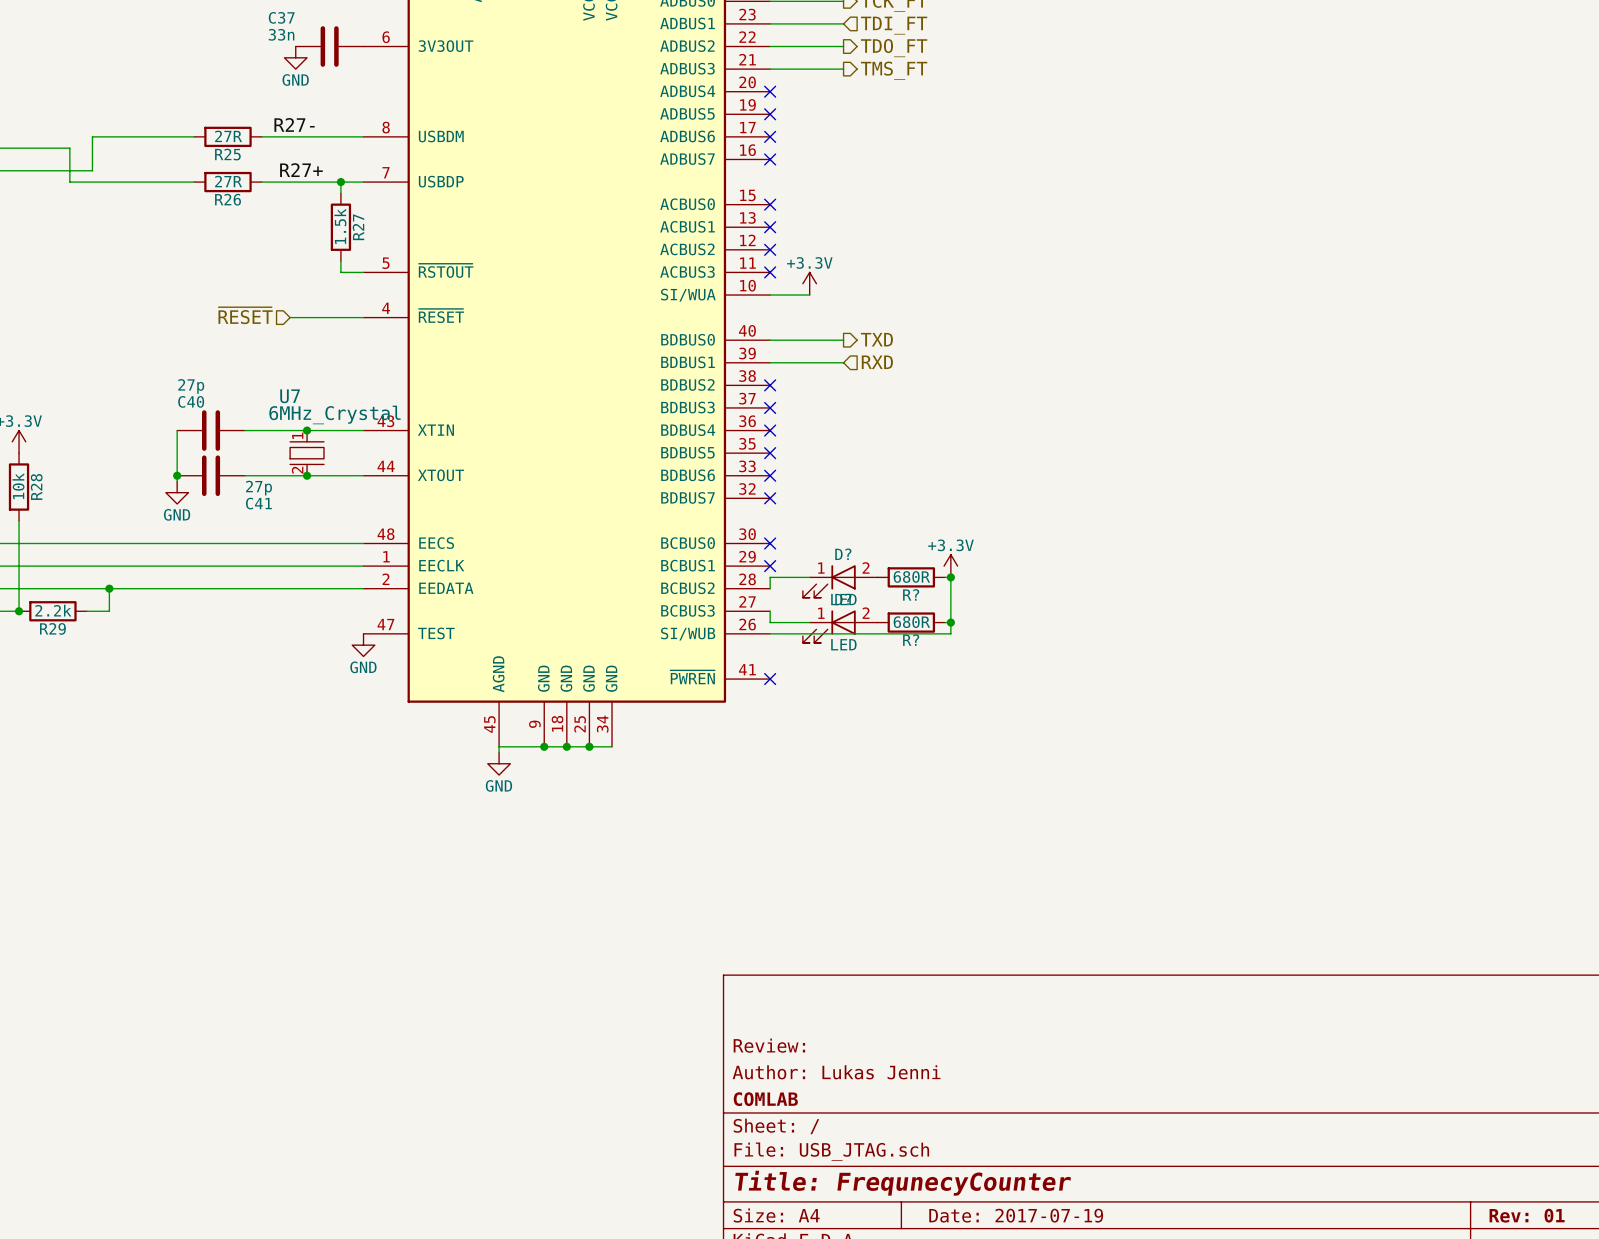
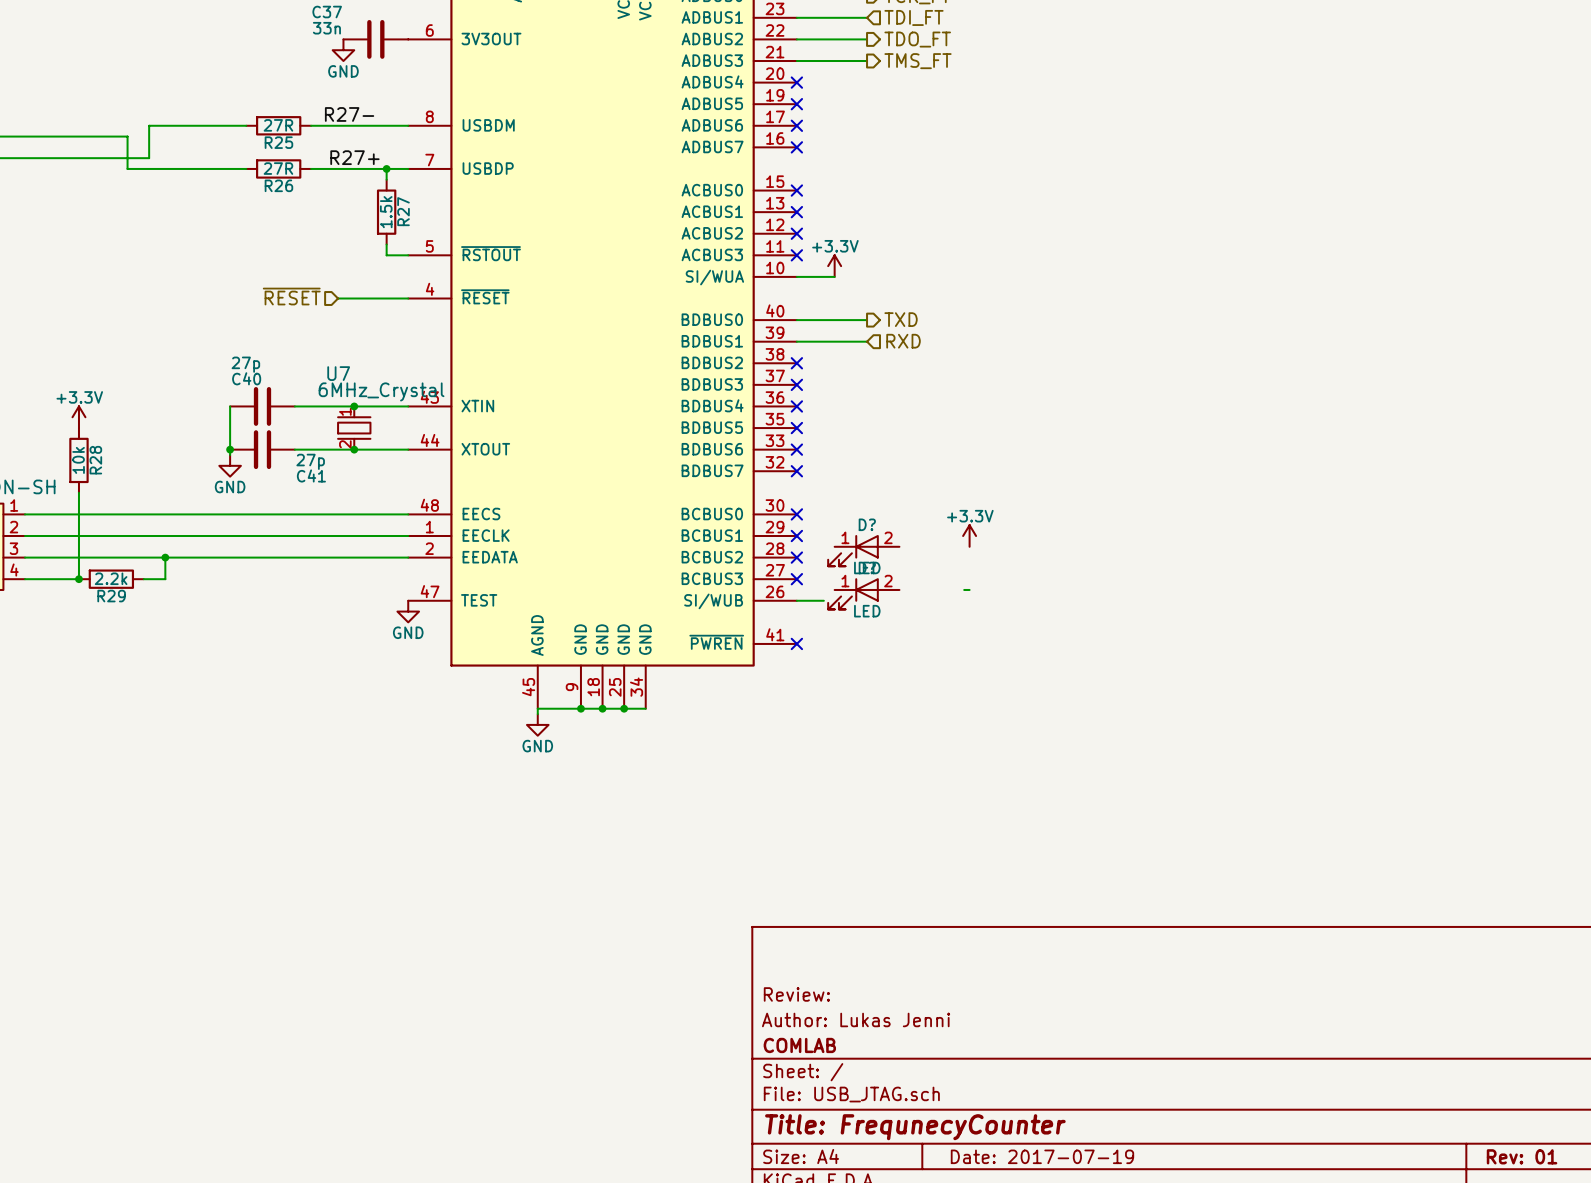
wire: (809, 577) (770, 577) (770, 588) -> none
R?: 680R (911, 577) -> none
wire: (945, 577) (950, 577) (950, 633) (798, 633) -> none
junction: (950, 577) -> none
no-connect mark: none -> (796, 557)
wire: (770, 611) (770, 622) (809, 622) -> none
no-connect mark: none -> (796, 579)
R?: 680R (911, 622) -> none
junction: (950, 622) -> none

